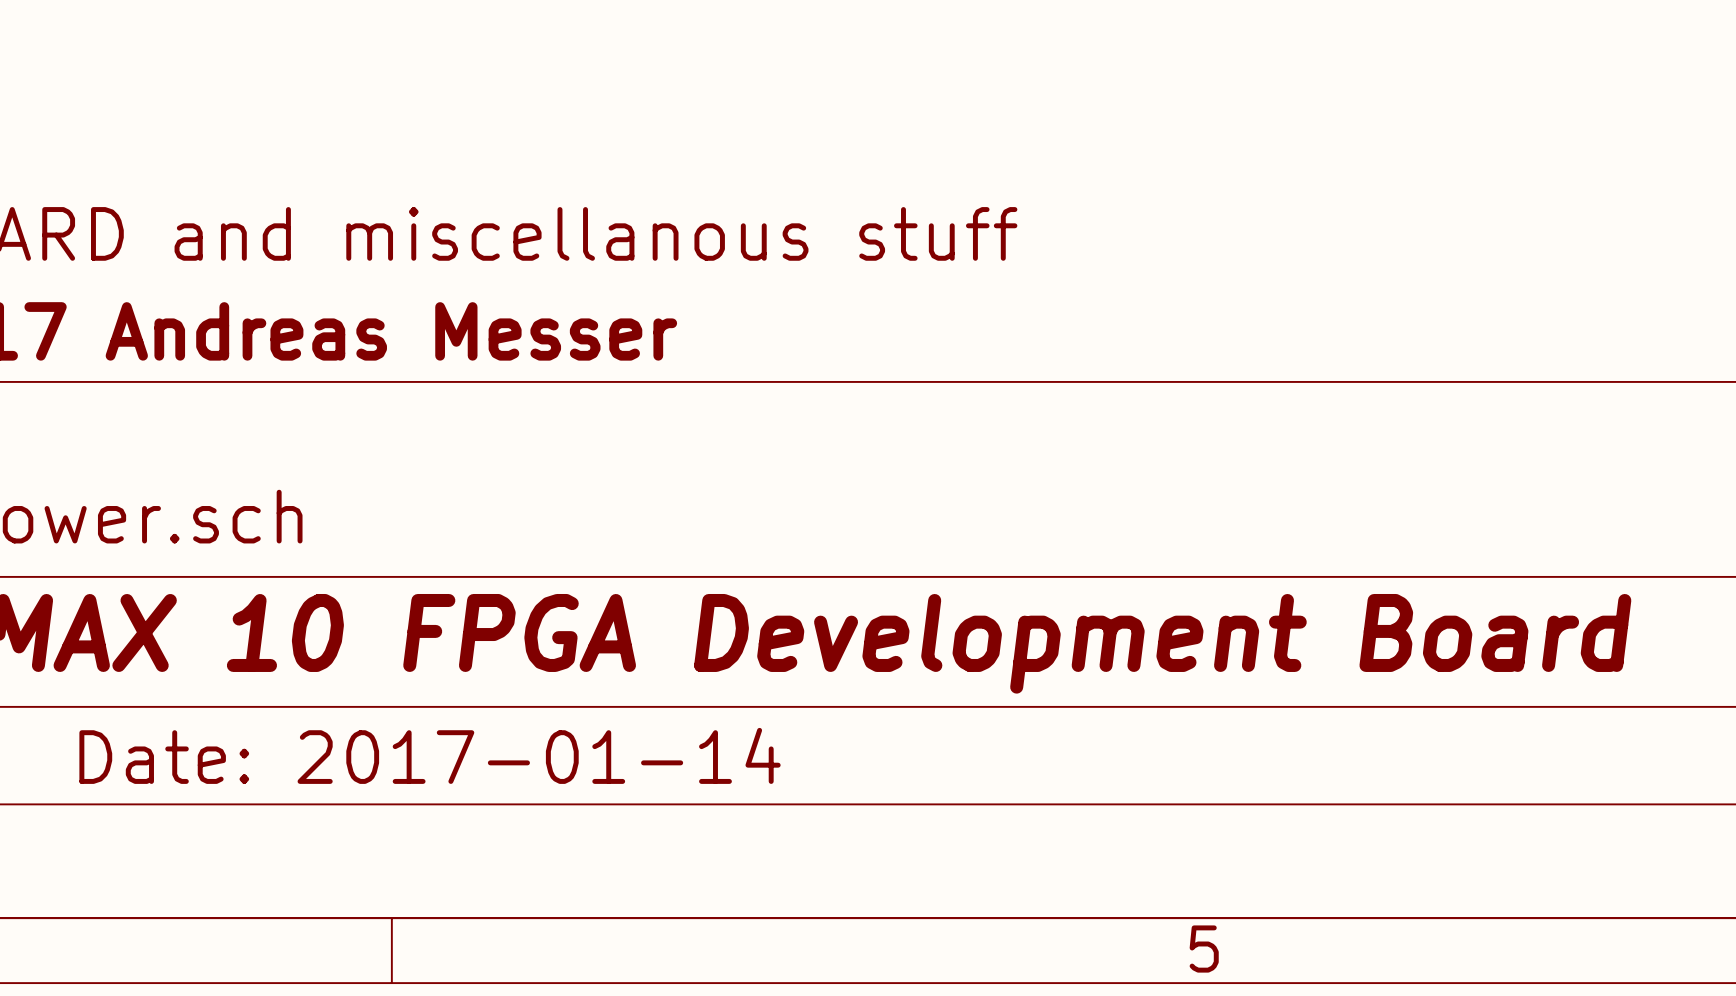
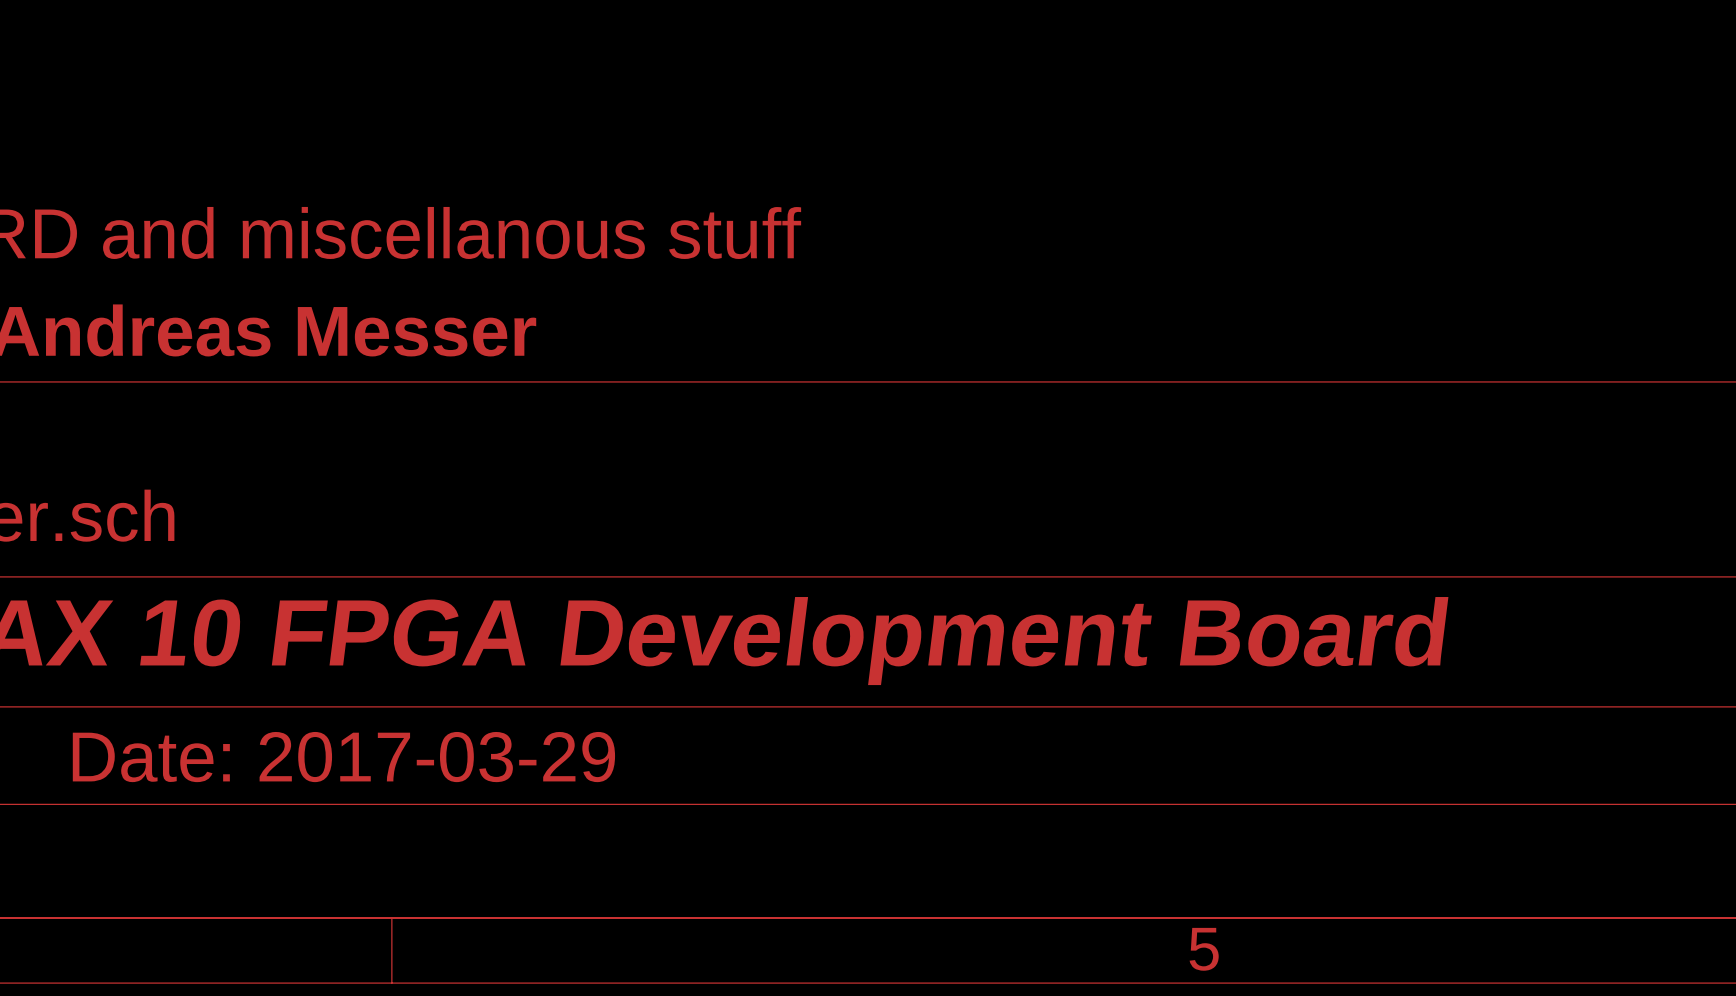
title block: Date: 2017-01-14 (430, 755) -> Date: 2017-03-29 (343, 757)

